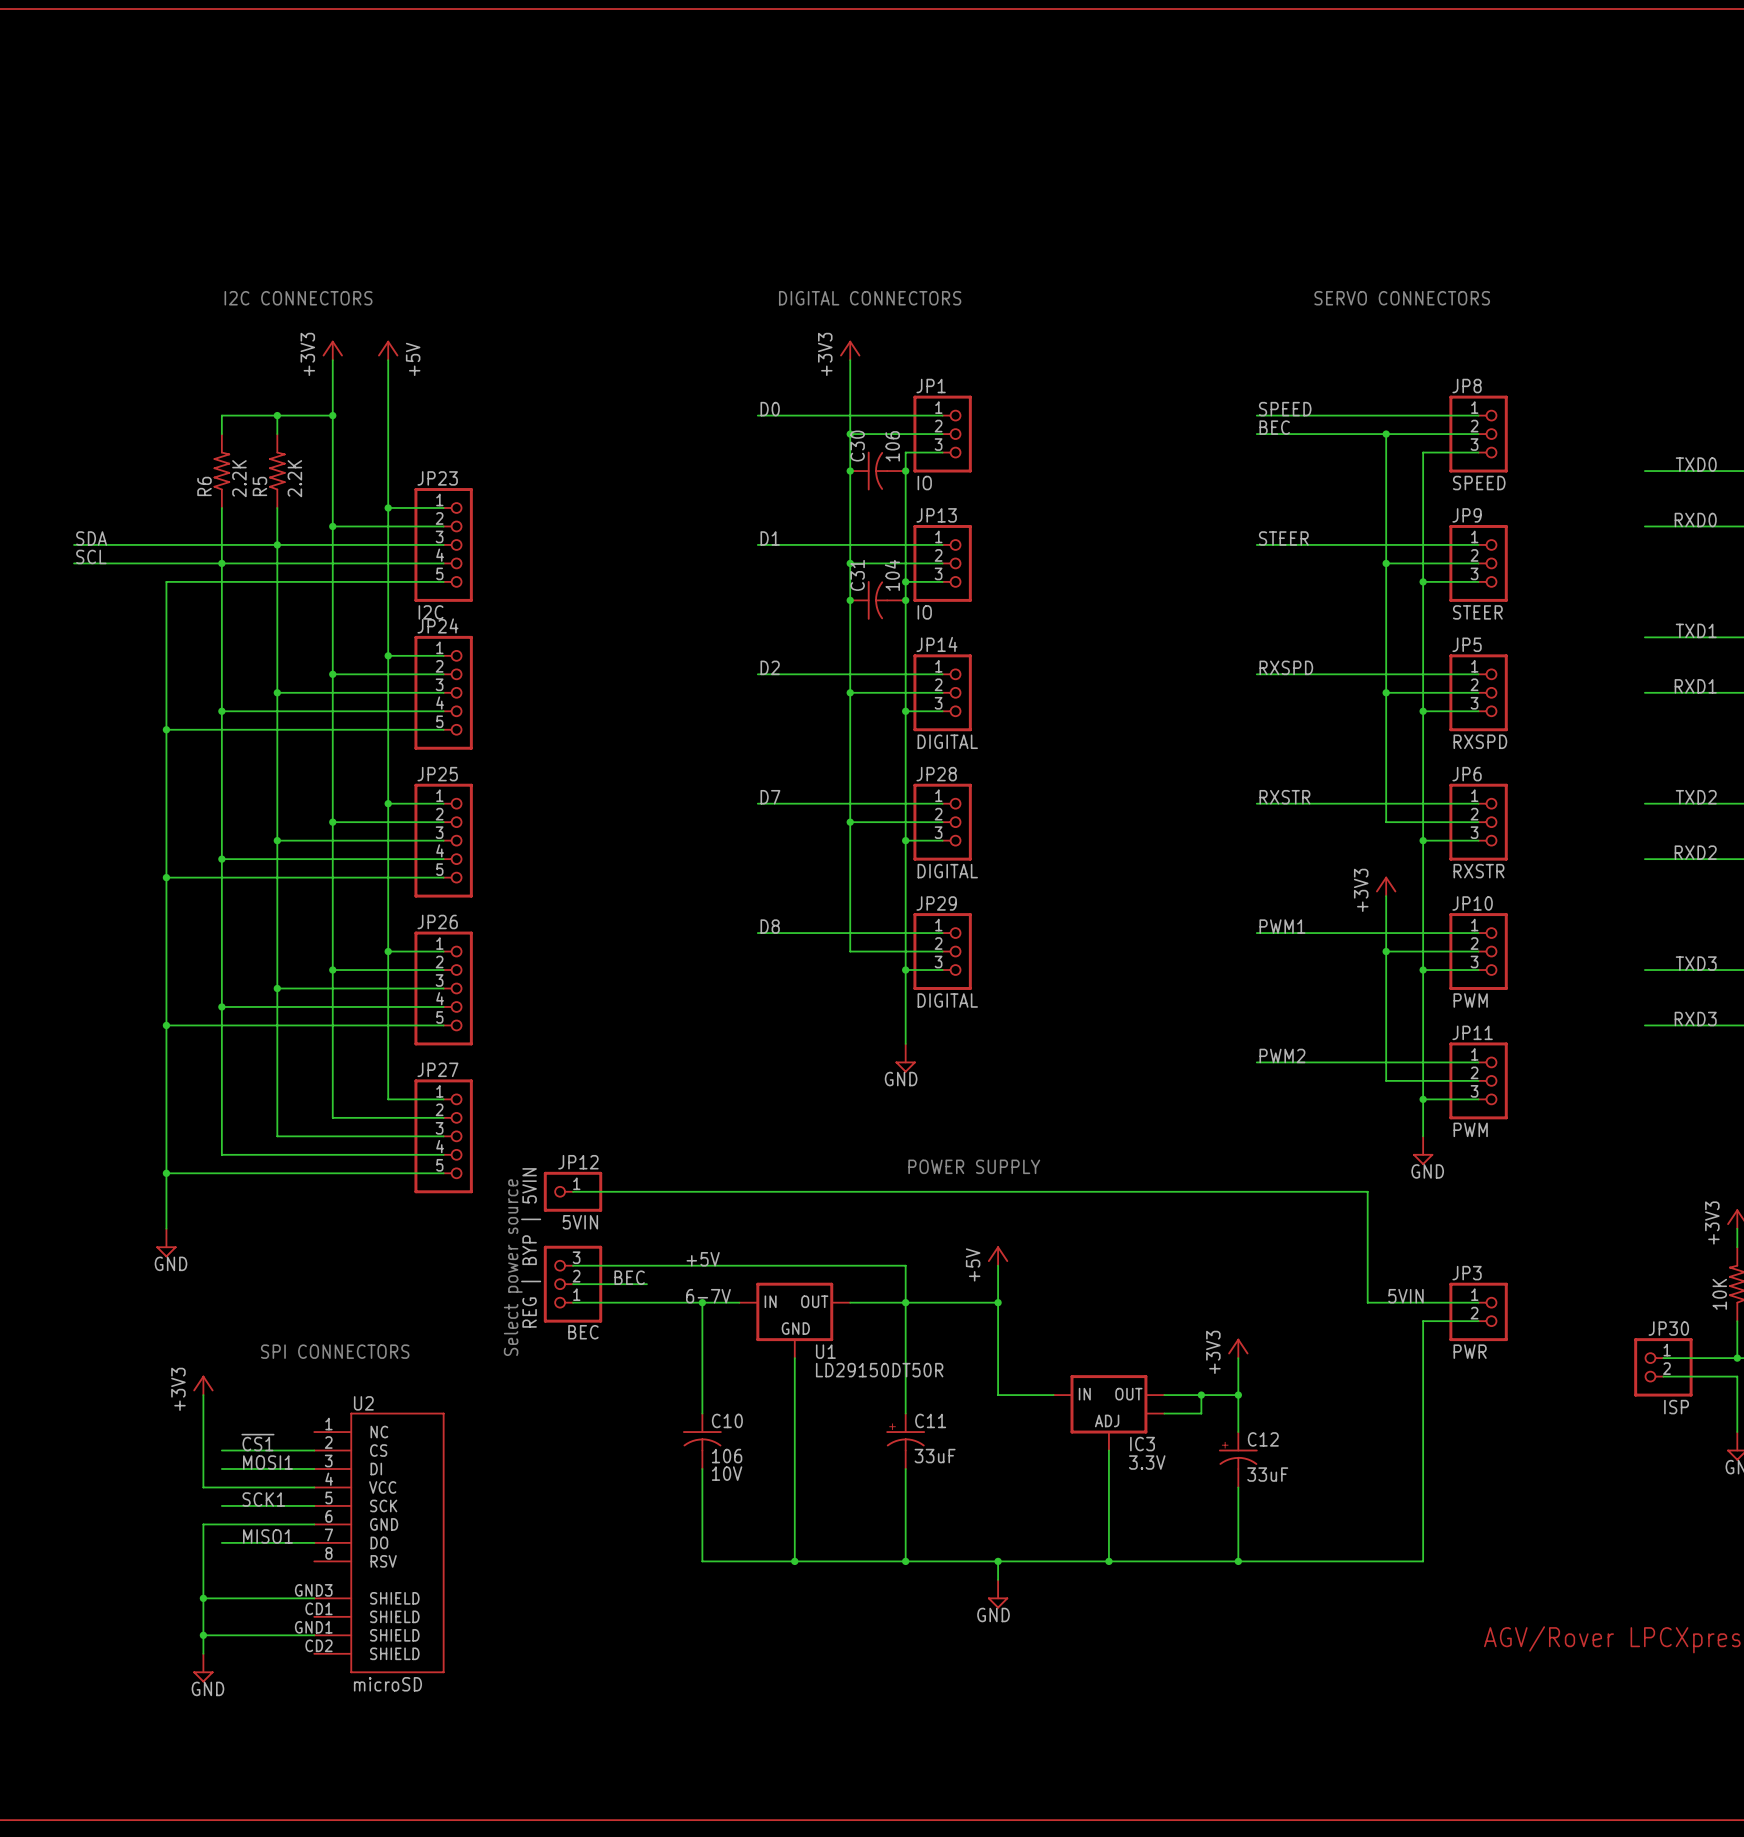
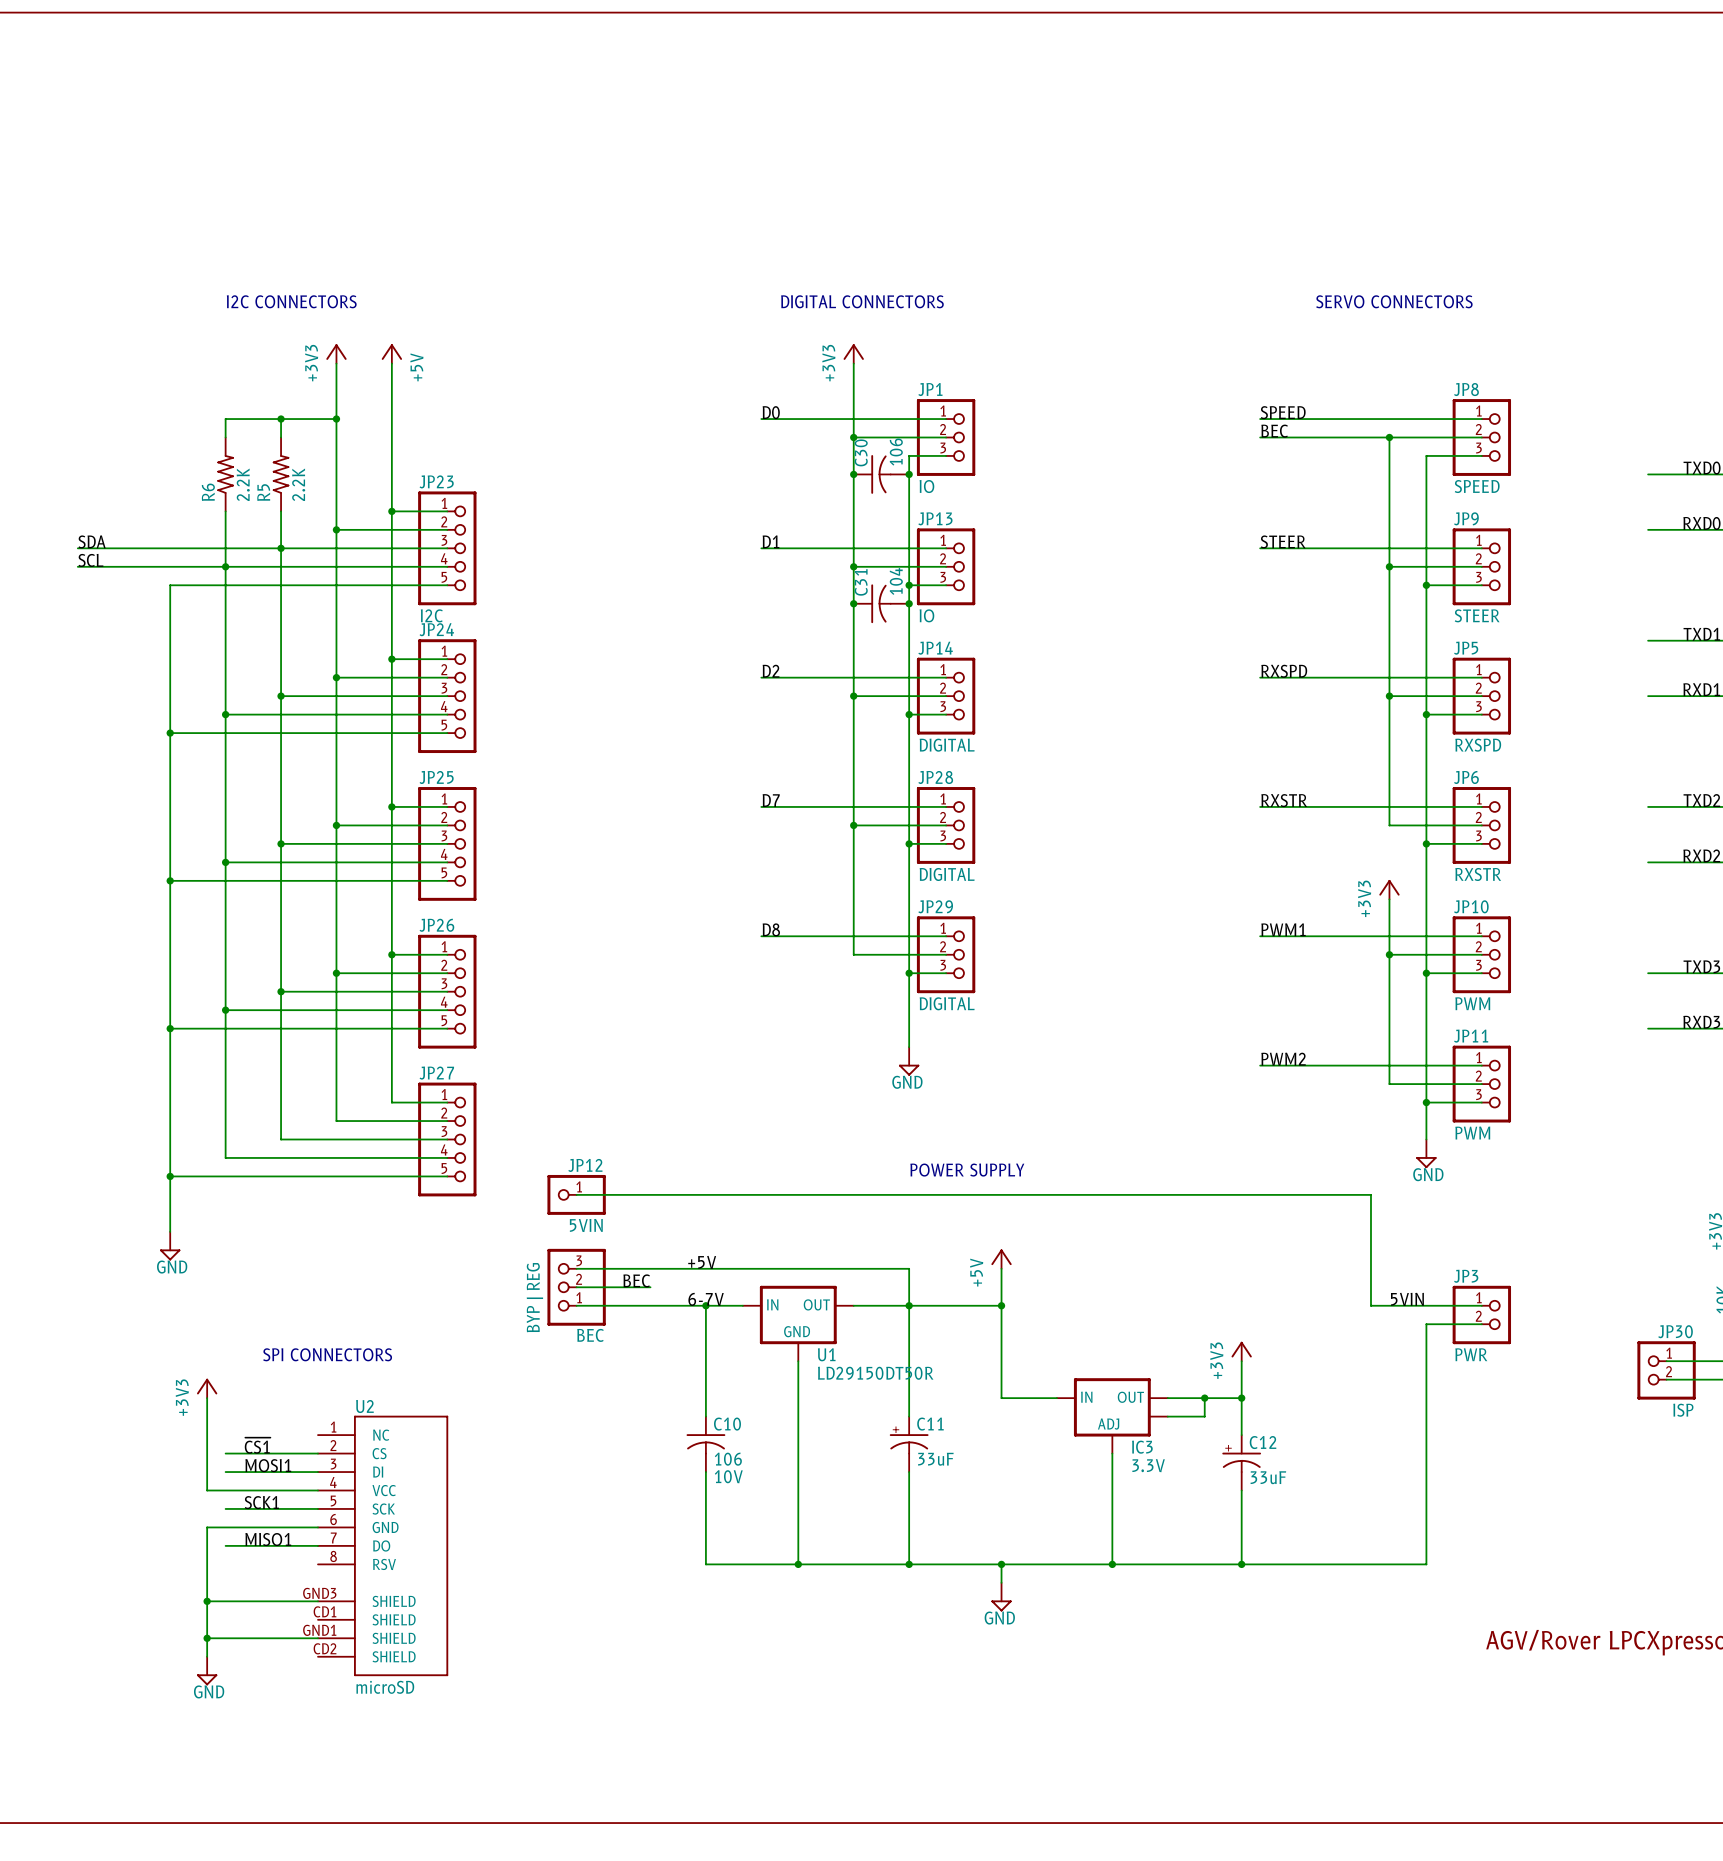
BEC value: REG | BYP | 5VIN (531, 1247) -> BYP | REG (534, 1297)
text: Select power source (513, 1267) -> none

